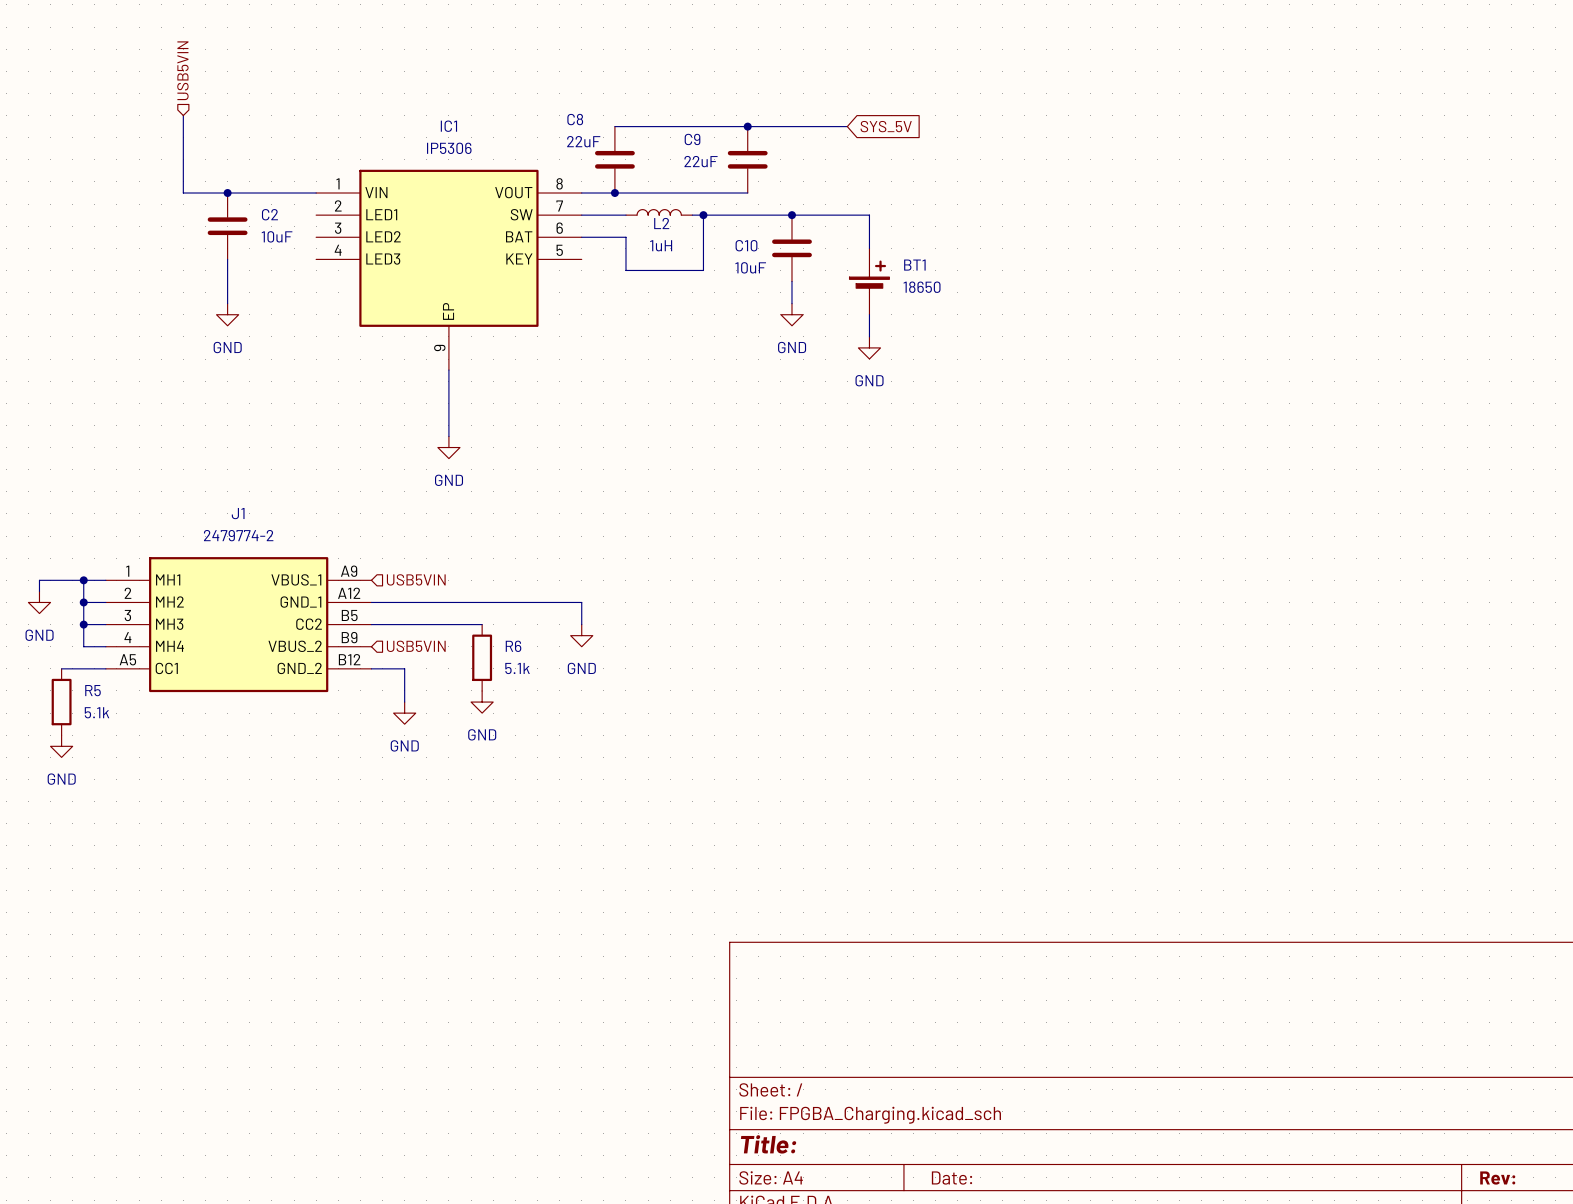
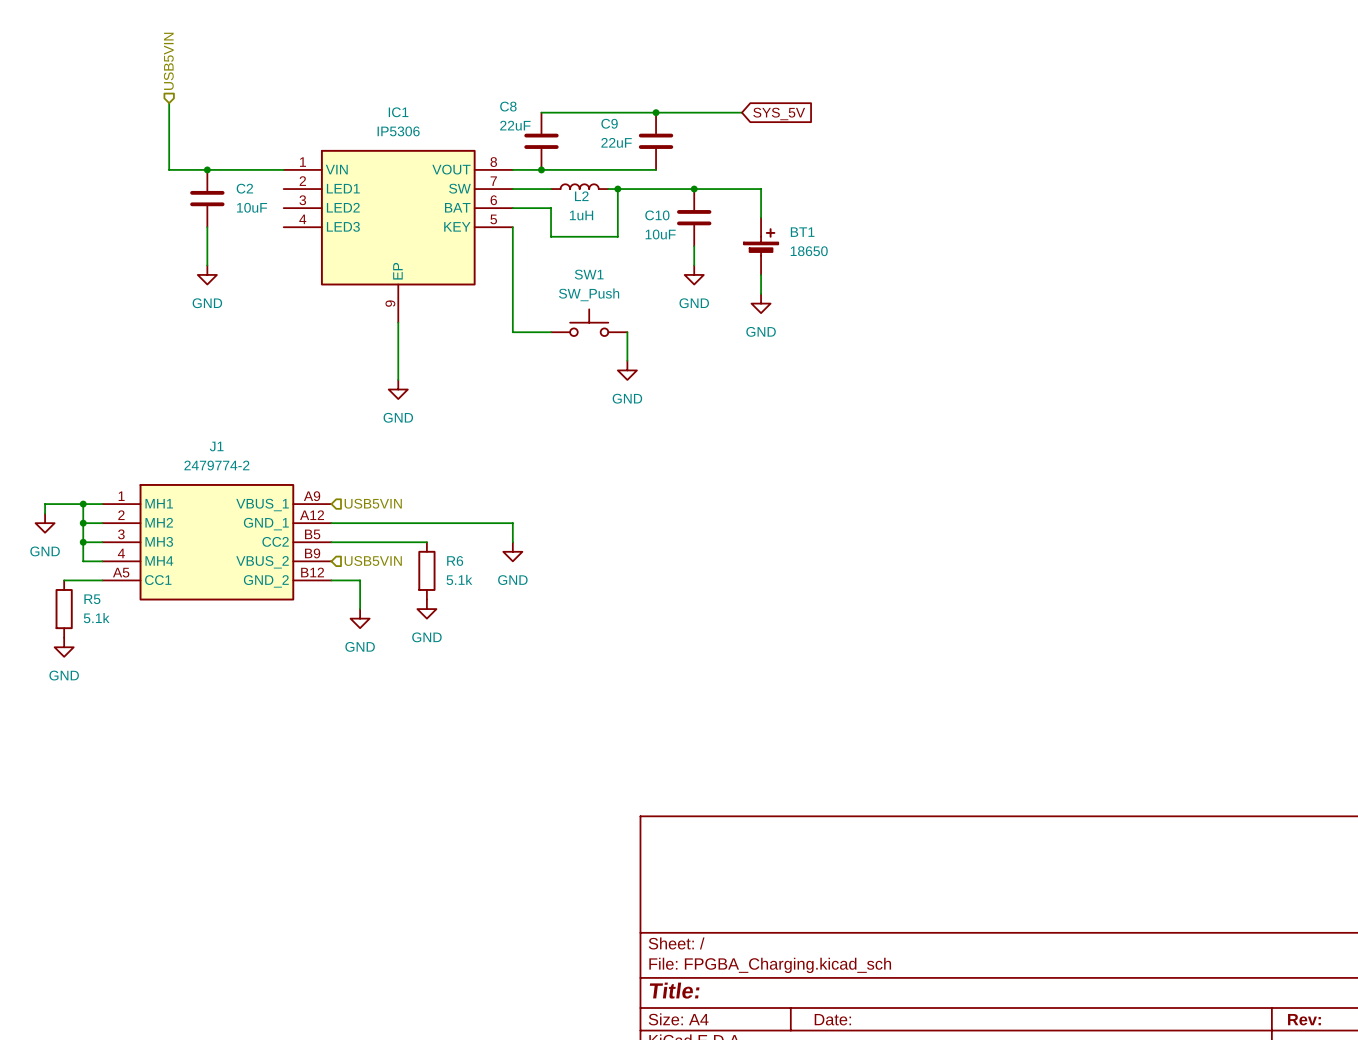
wire: none -> (512, 227) (512, 332) (551, 332)
SW1: none -> SW_Push (589, 322)
wire: none -> (627, 332) (627, 360)
power symbol: none -> GND (627, 370)

